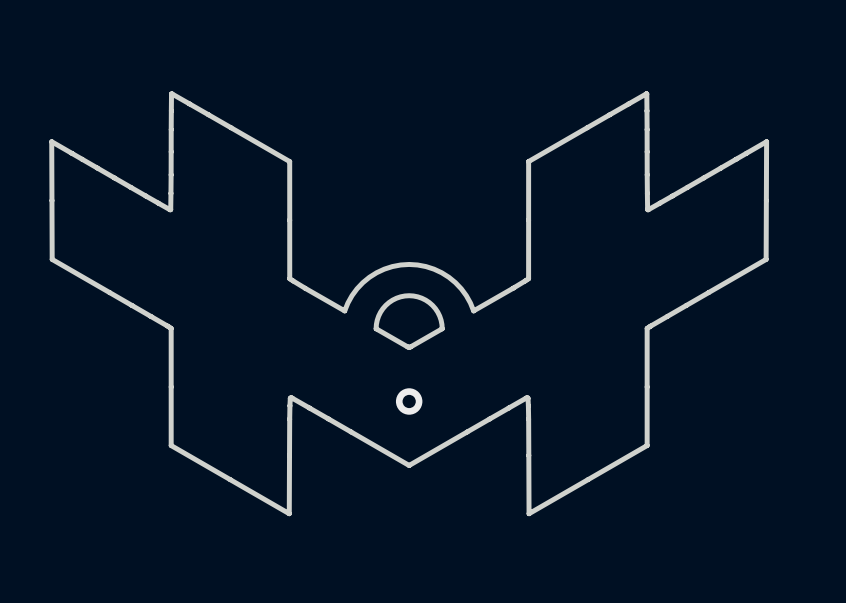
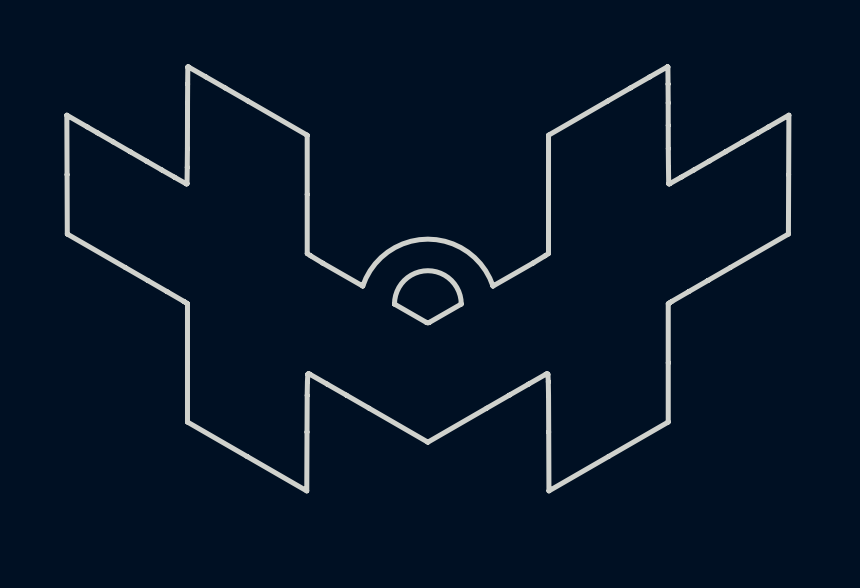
via: (409, 401) -> none

